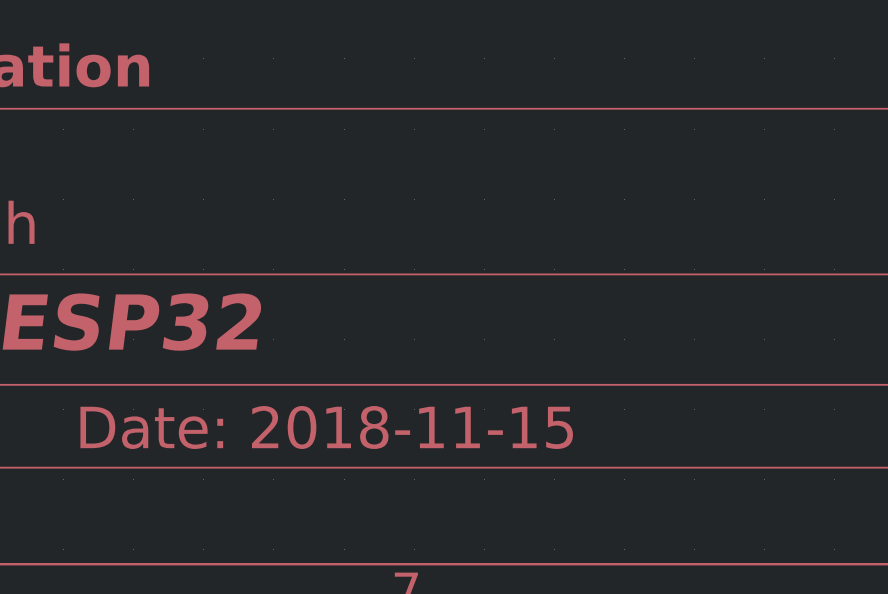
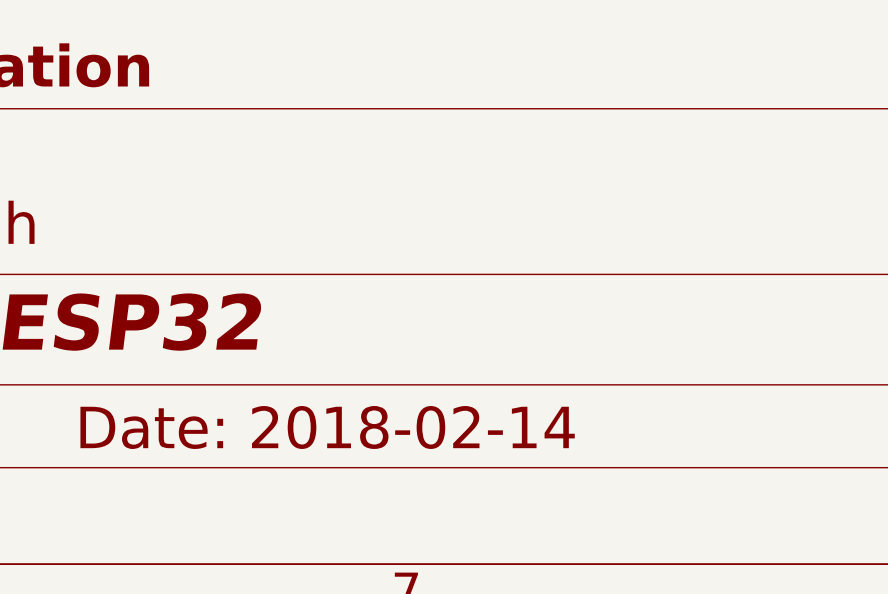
title block: Date: 2018-11-15 (326, 427) -> Date: 2018-02-14 (327, 427)

